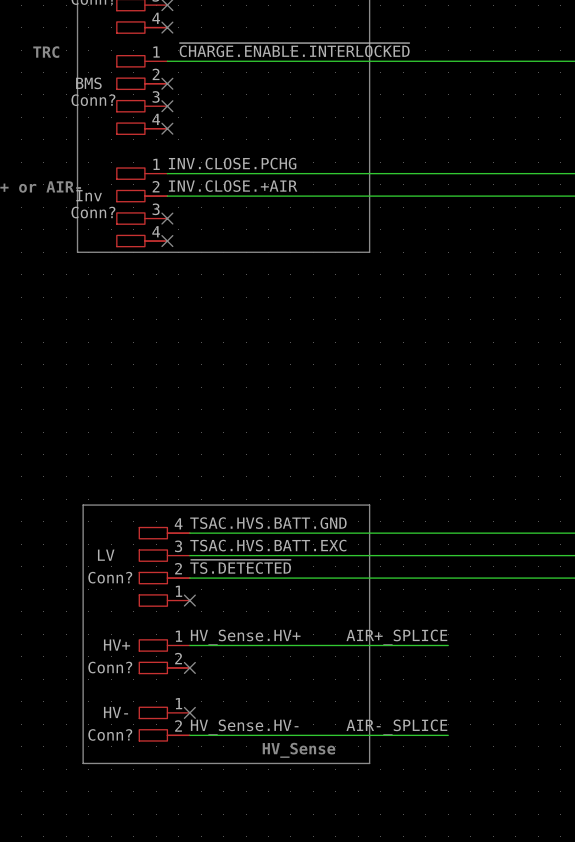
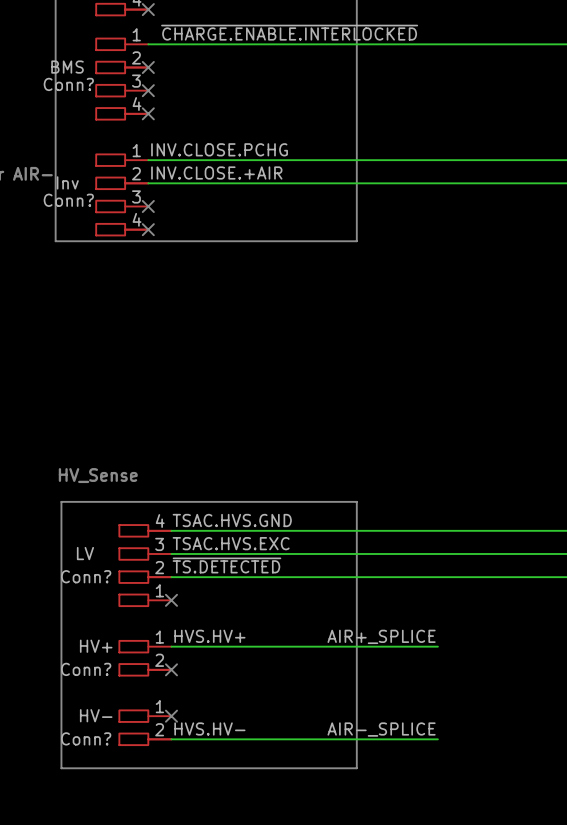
text: TRC (46, 52) -> none
text: none -> HV_Sense (98, 475)
label: TSAC.HVS.BATT.GND (268, 523) -> TSAC.HVS.GND (232, 520)
label: TSAC.HVS.BATT.EXC (268, 545) -> TSAC.HVS.EXC (231, 543)
label: HV_Sense.HV+ (245, 637) -> HVS.HV+ (209, 636)
label: HV_Sense.HV- (244, 727) -> HVS.HV- (209, 728)
text: HV_Sense (299, 750) -> none

